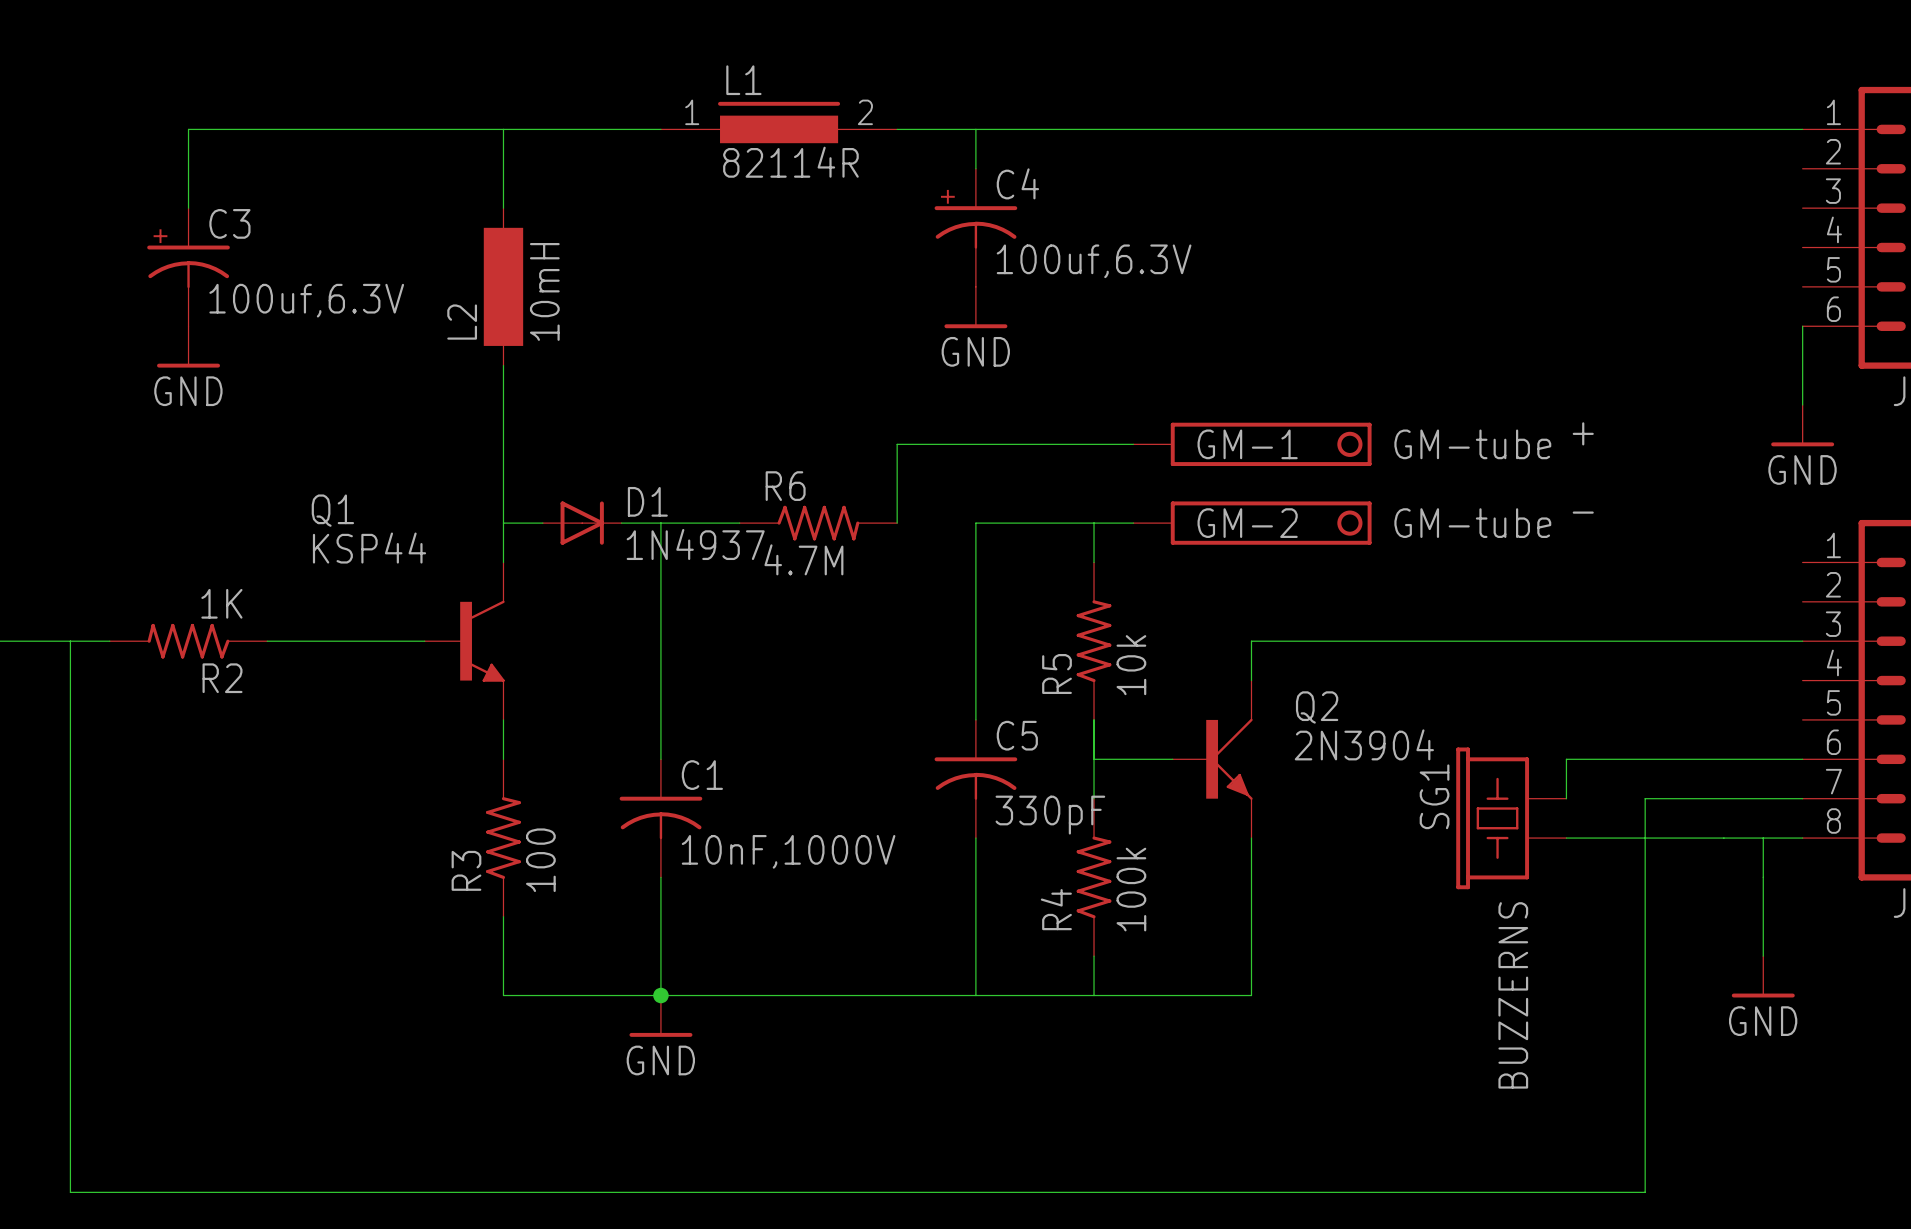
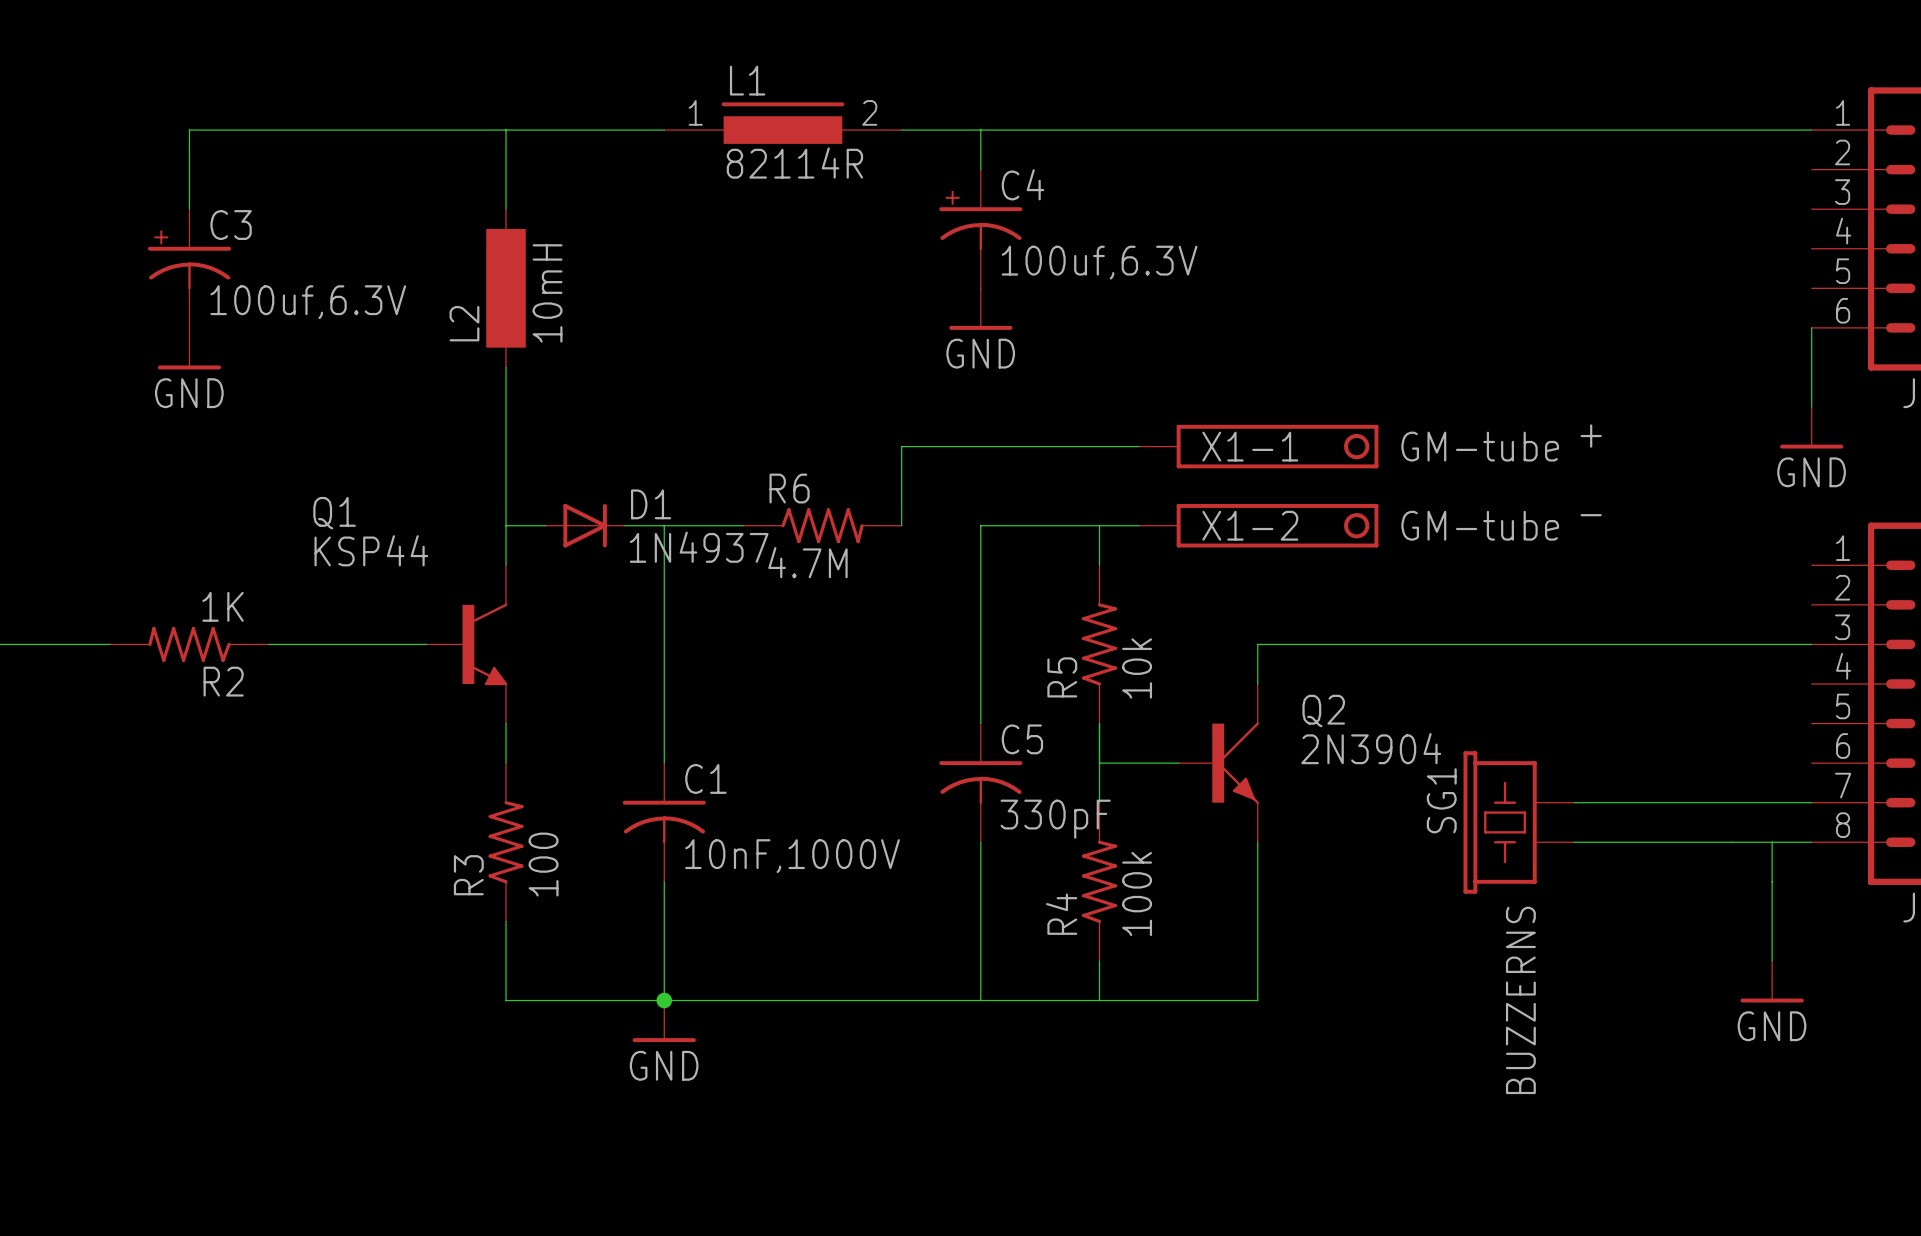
GM-1 name: GM-1 (1247, 444) -> X1-1 (1250, 446)
GM-2 name: GM-2 (1247, 523) -> X1-2 (1250, 525)
wire: (70, 641) (70, 1192) (1645, 1192) (1645, 798) -> none
wire: (1802, 759) (1566, 759) (1566, 798) -> (1653, 802) (1574, 802)

